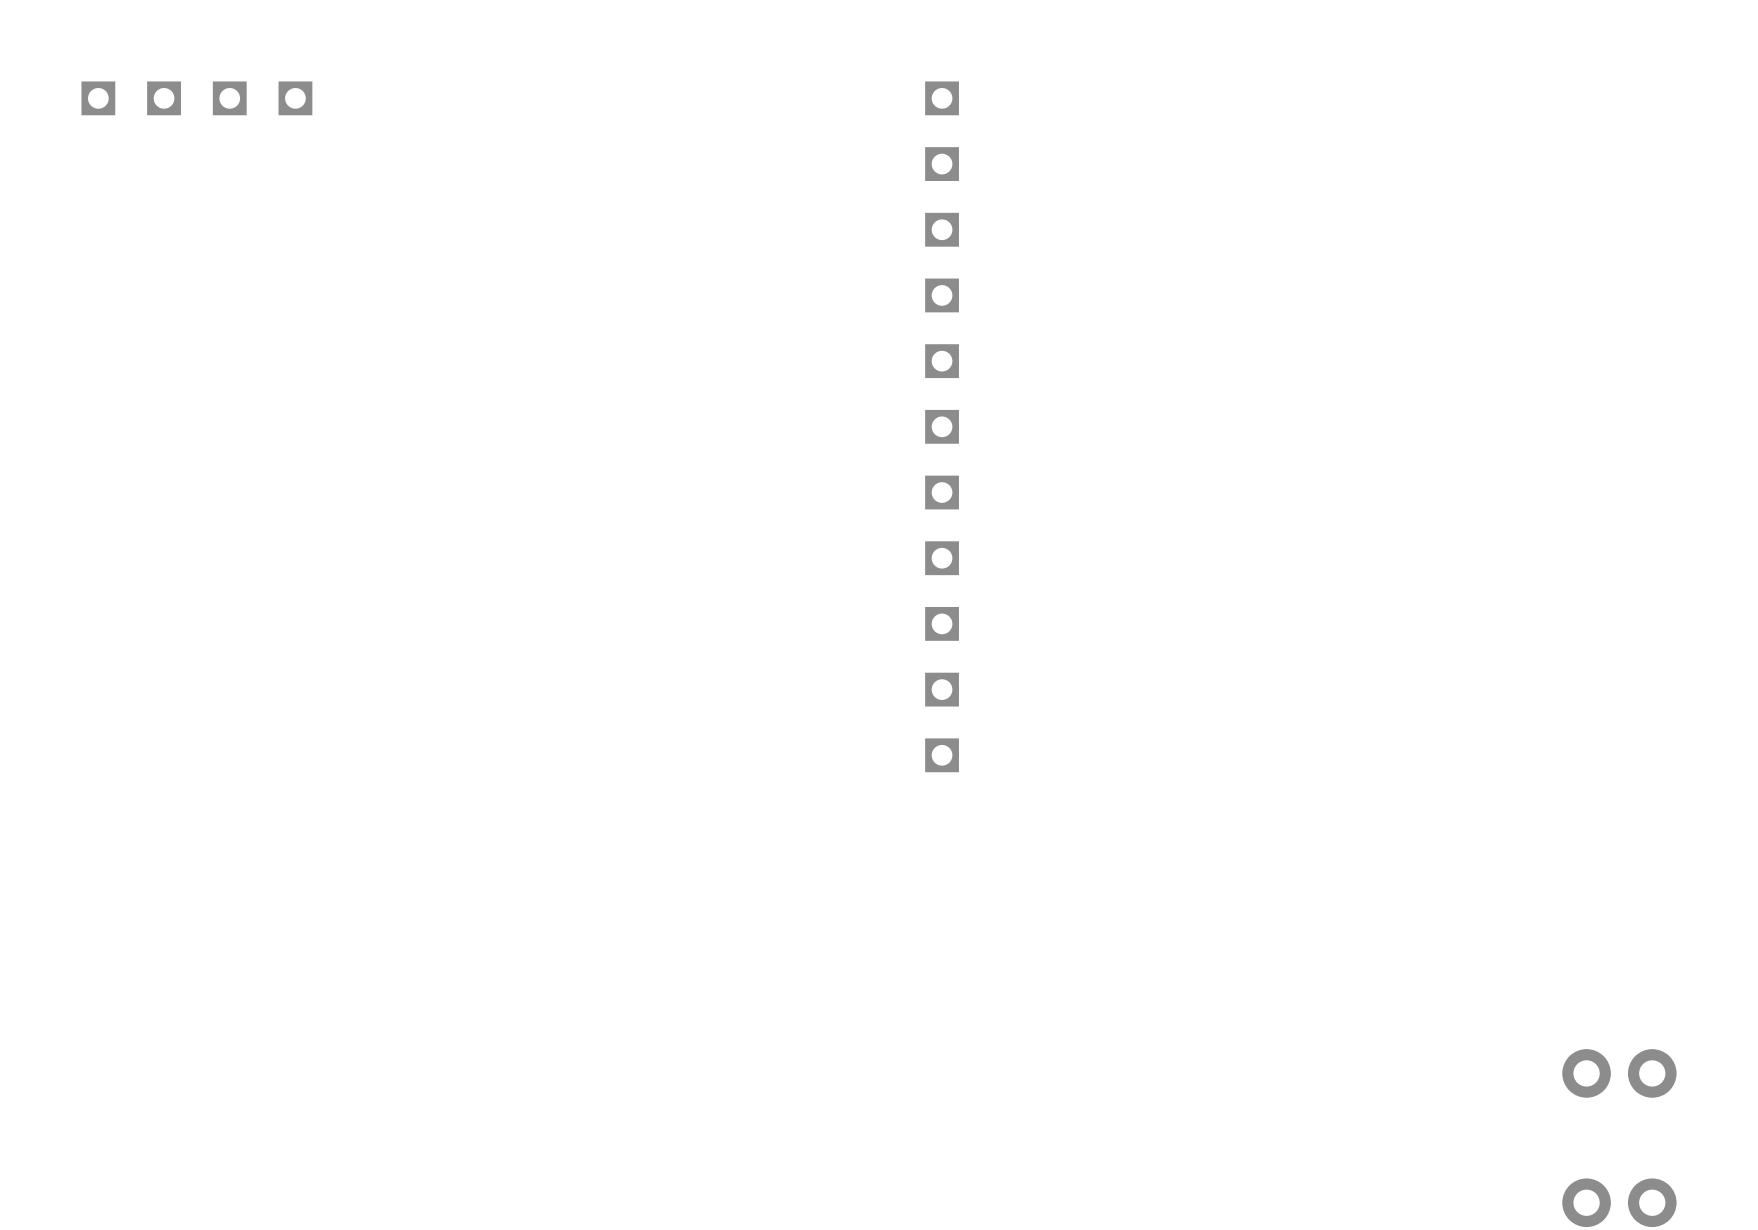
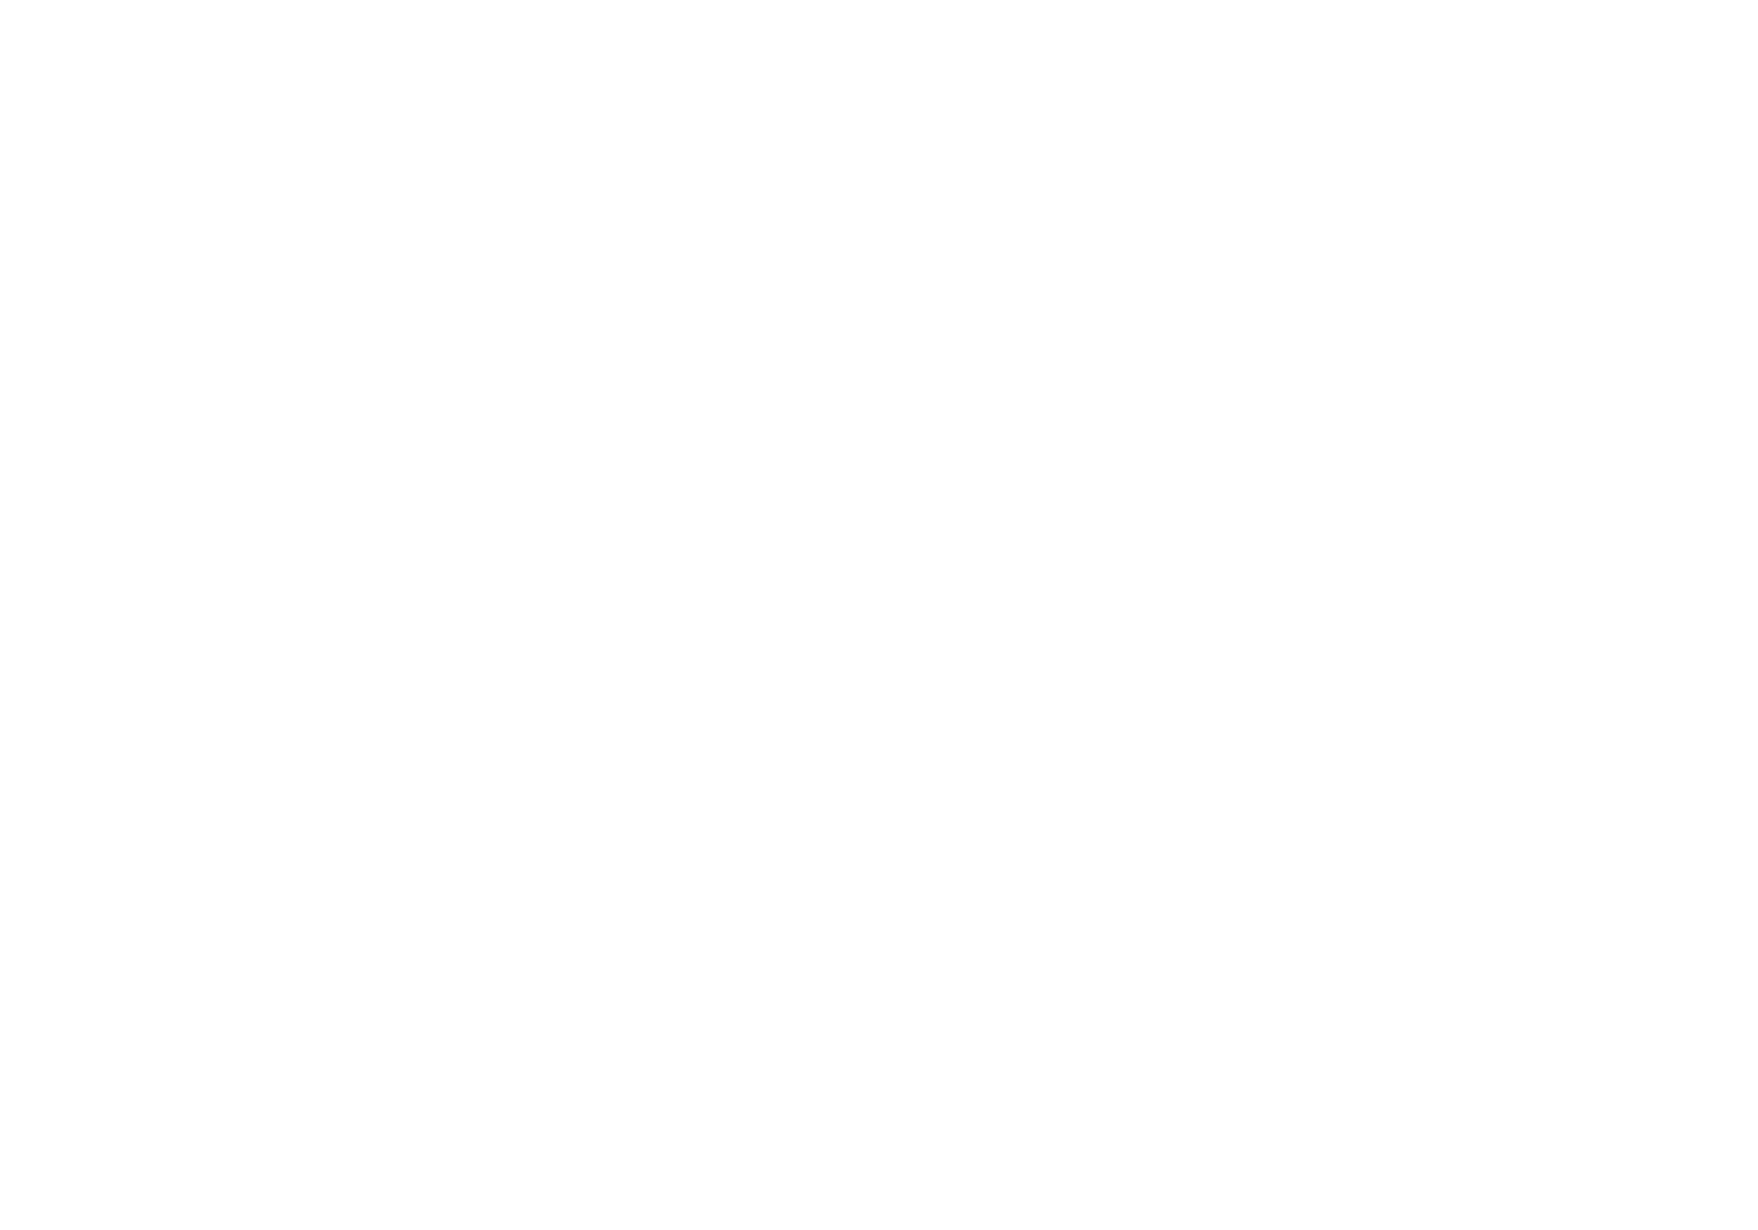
part: (196, 98) -> none
part: (942, 426) -> none
part: (1619, 1073) -> none
part: (1619, 1202) -> none

